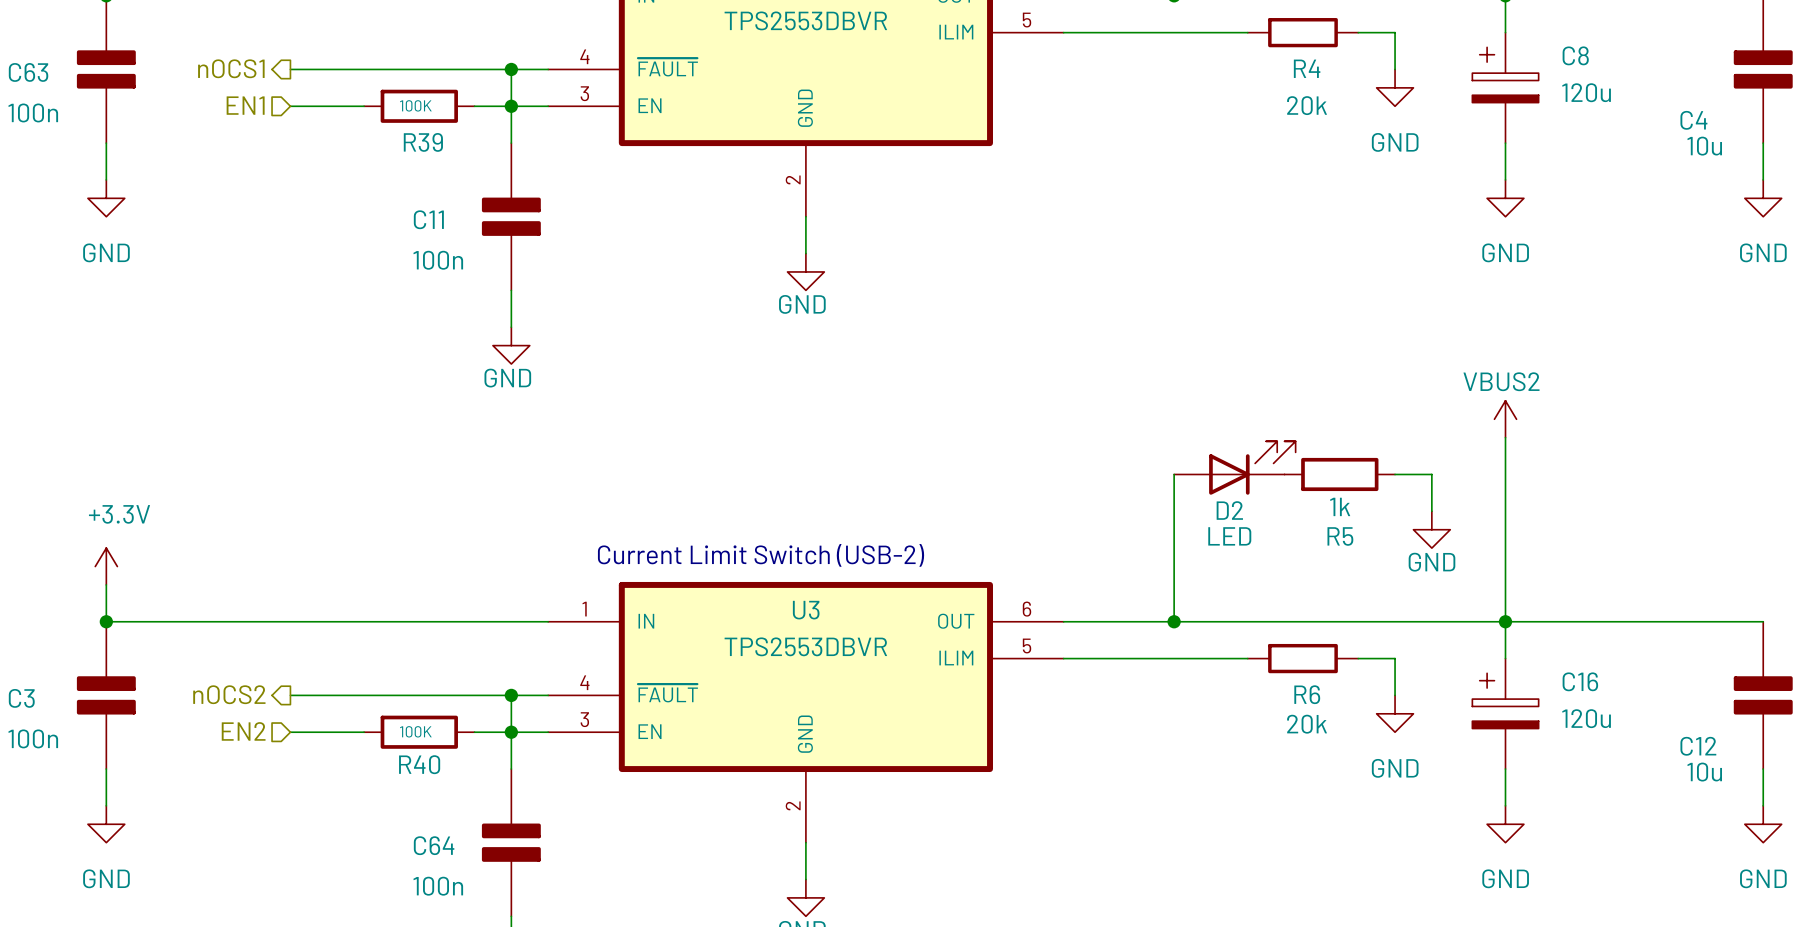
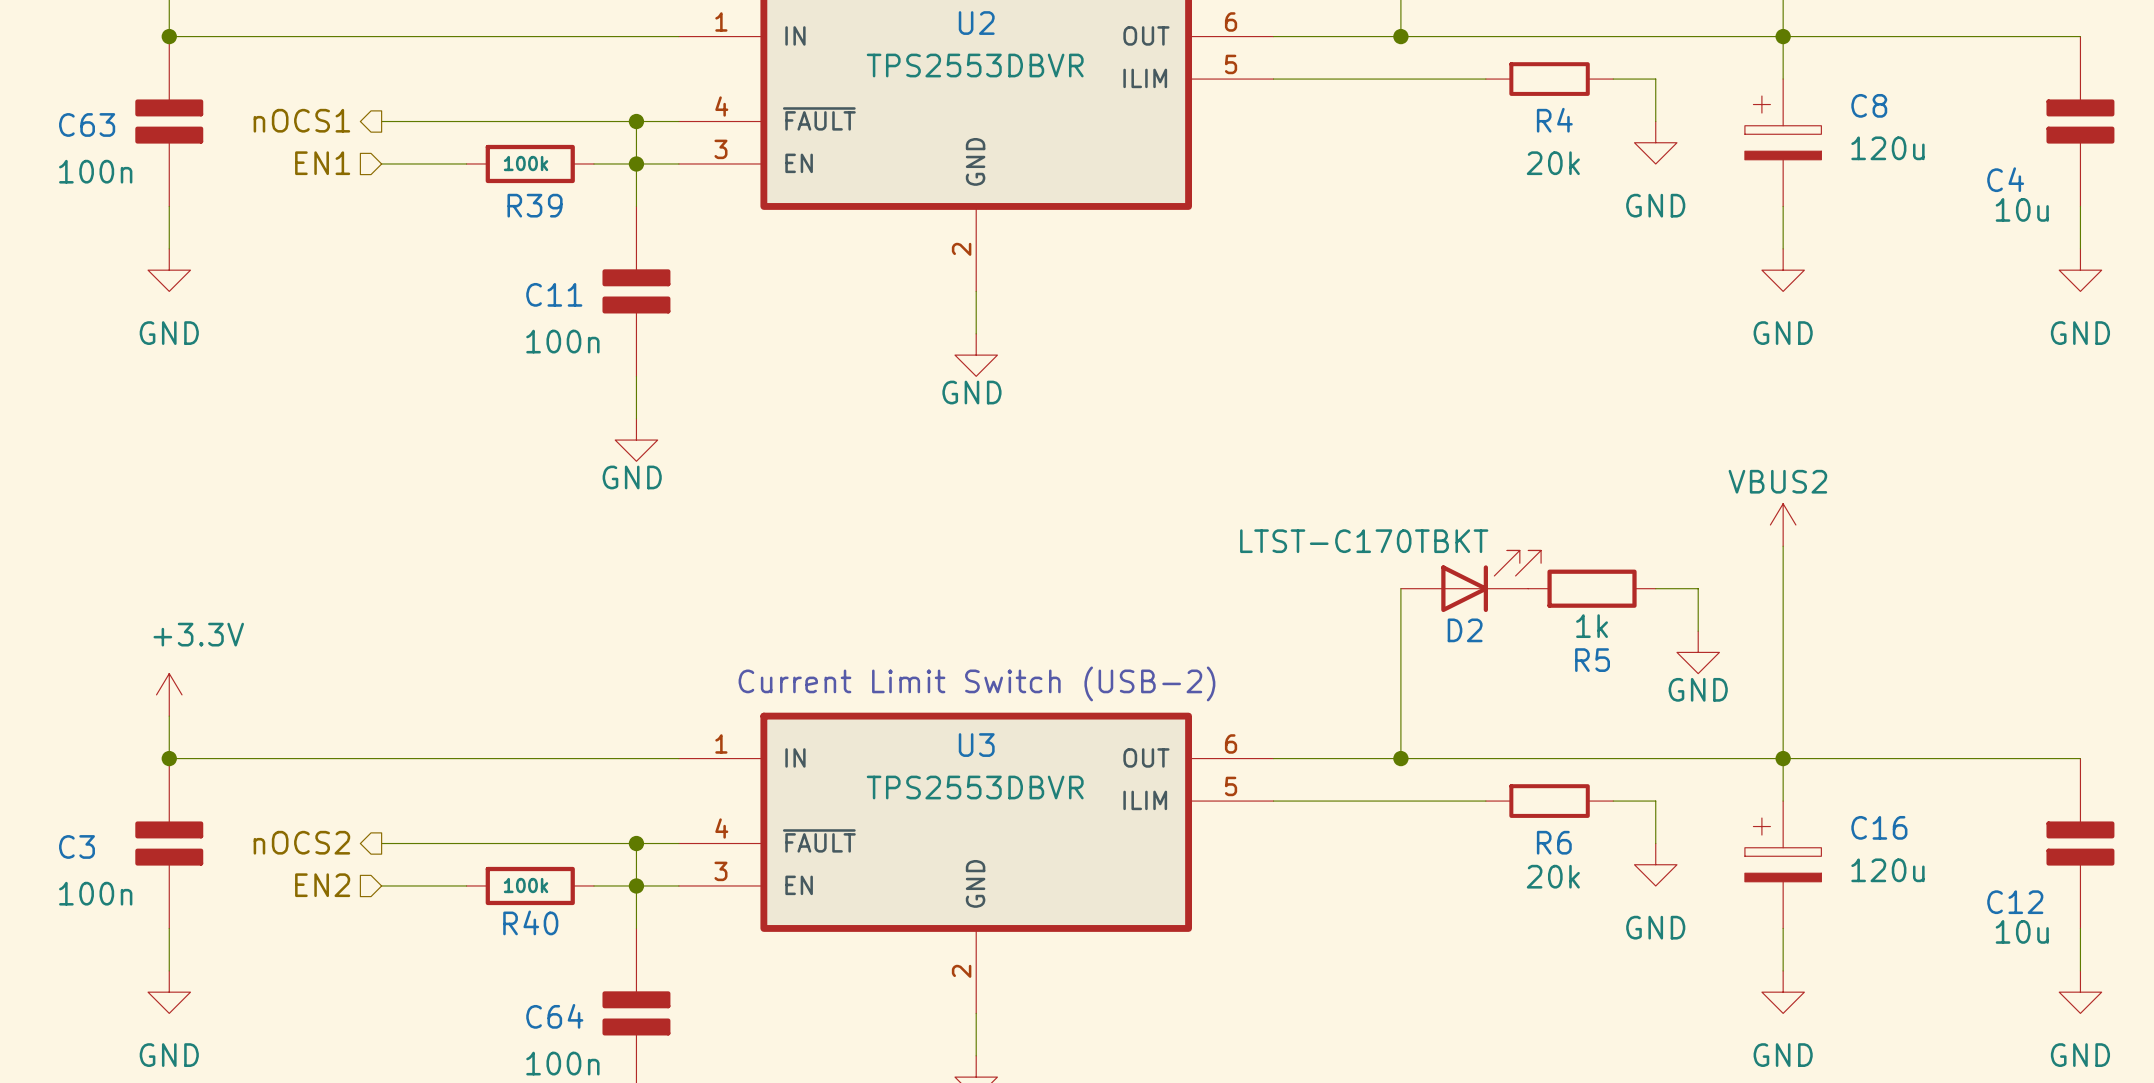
R39 value: 100K (415, 105) -> 100k (526, 163)
D2 value: LED (1229, 536) -> LTST-C170TBKT (1364, 541)
R40 value: 100K (415, 731) -> 100k (526, 885)

